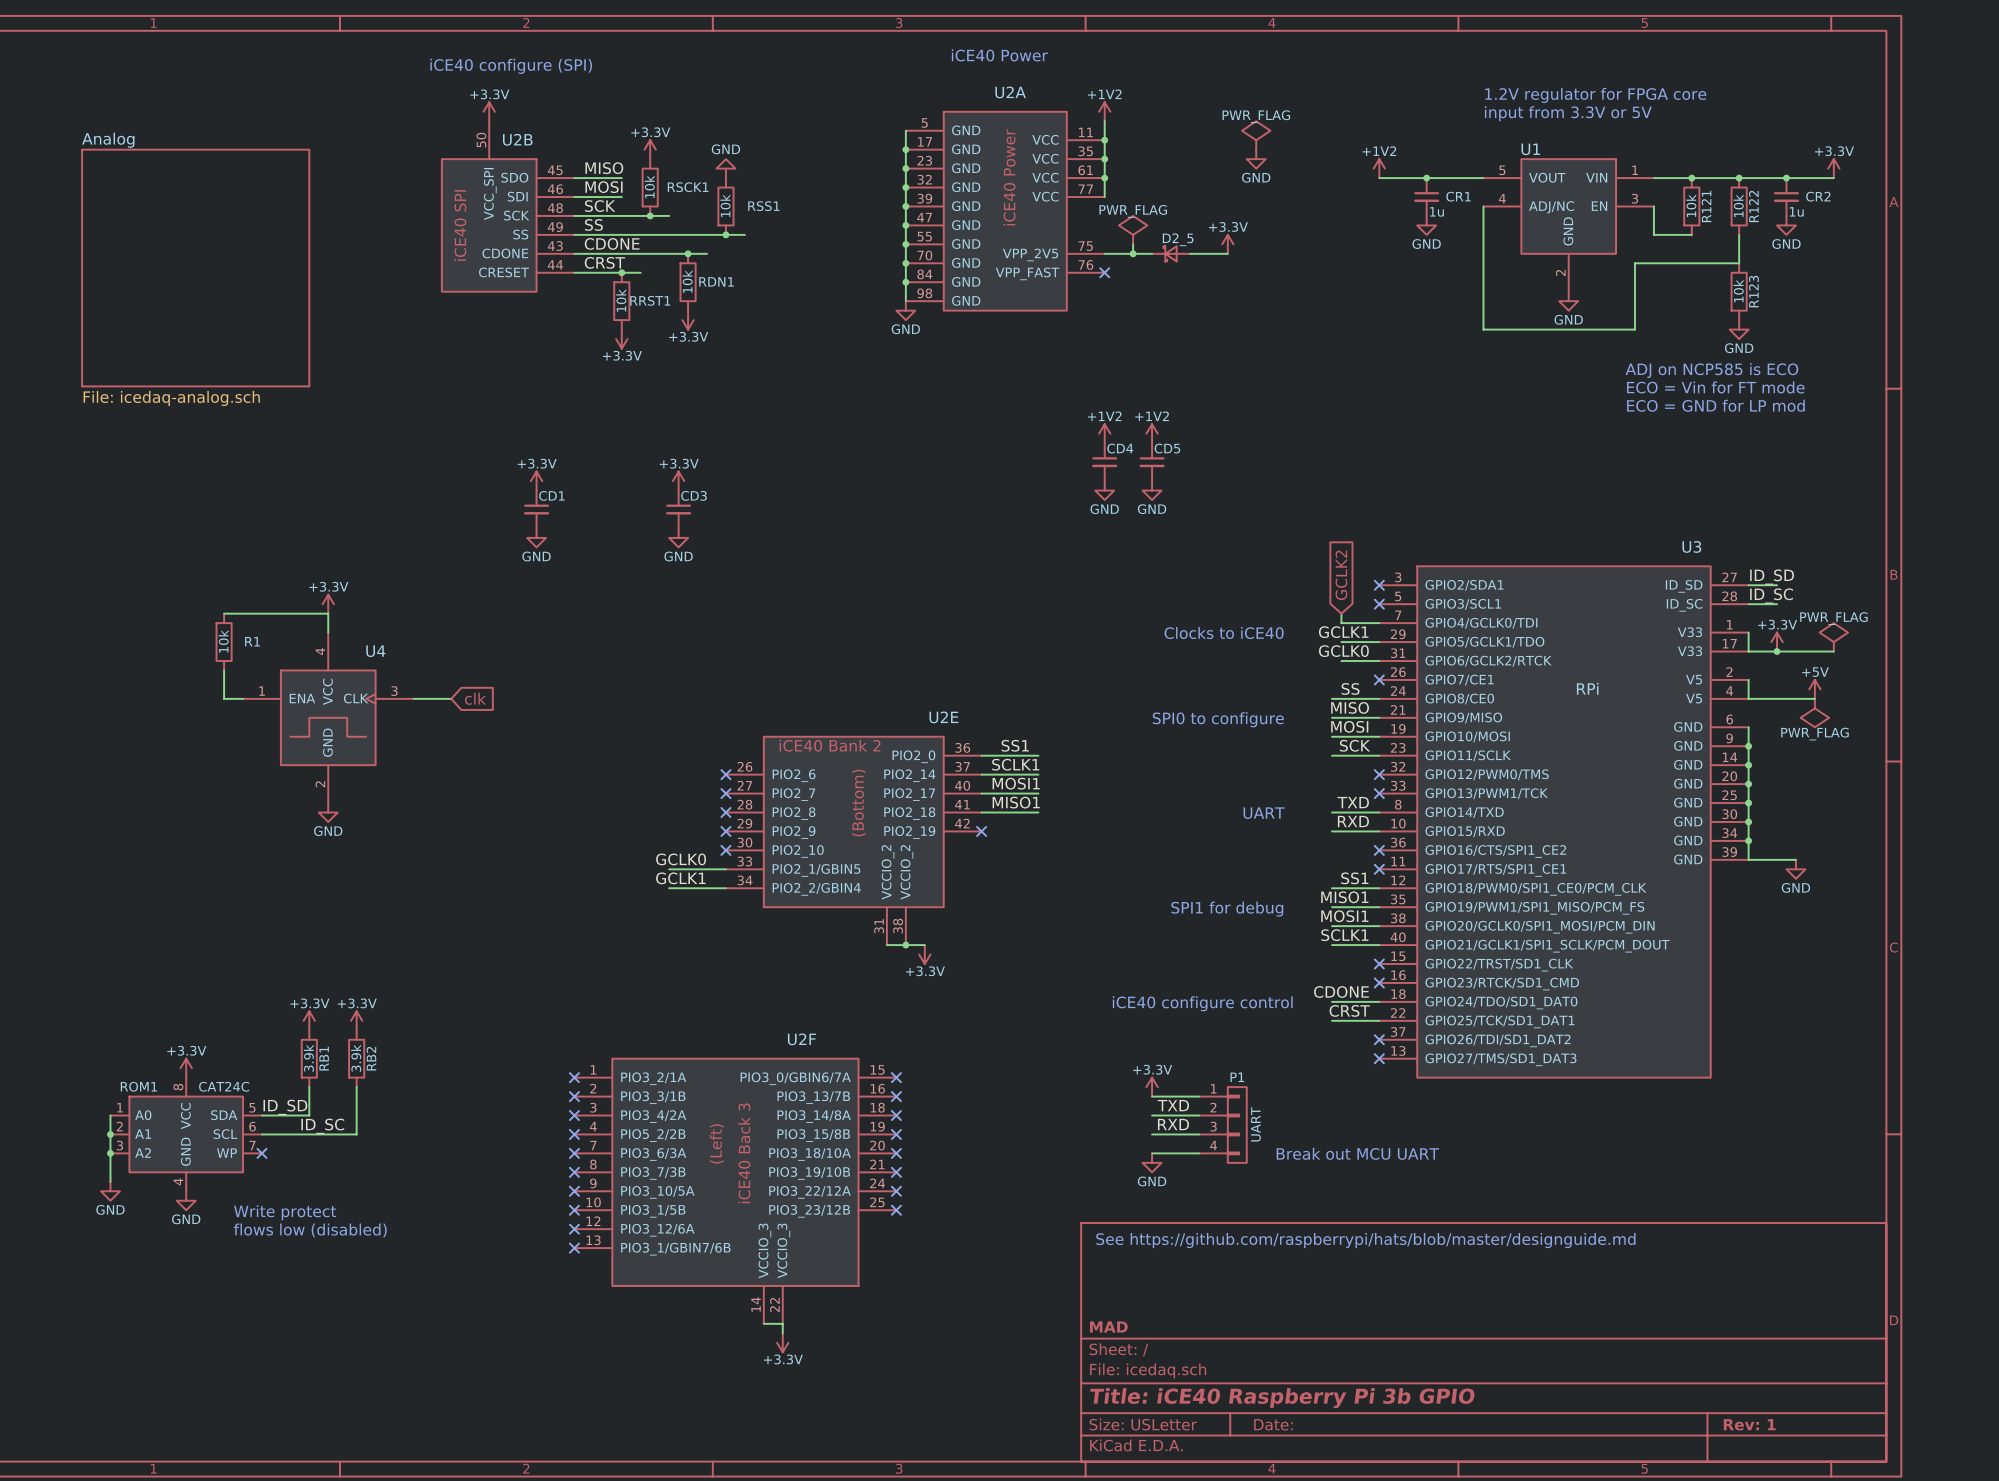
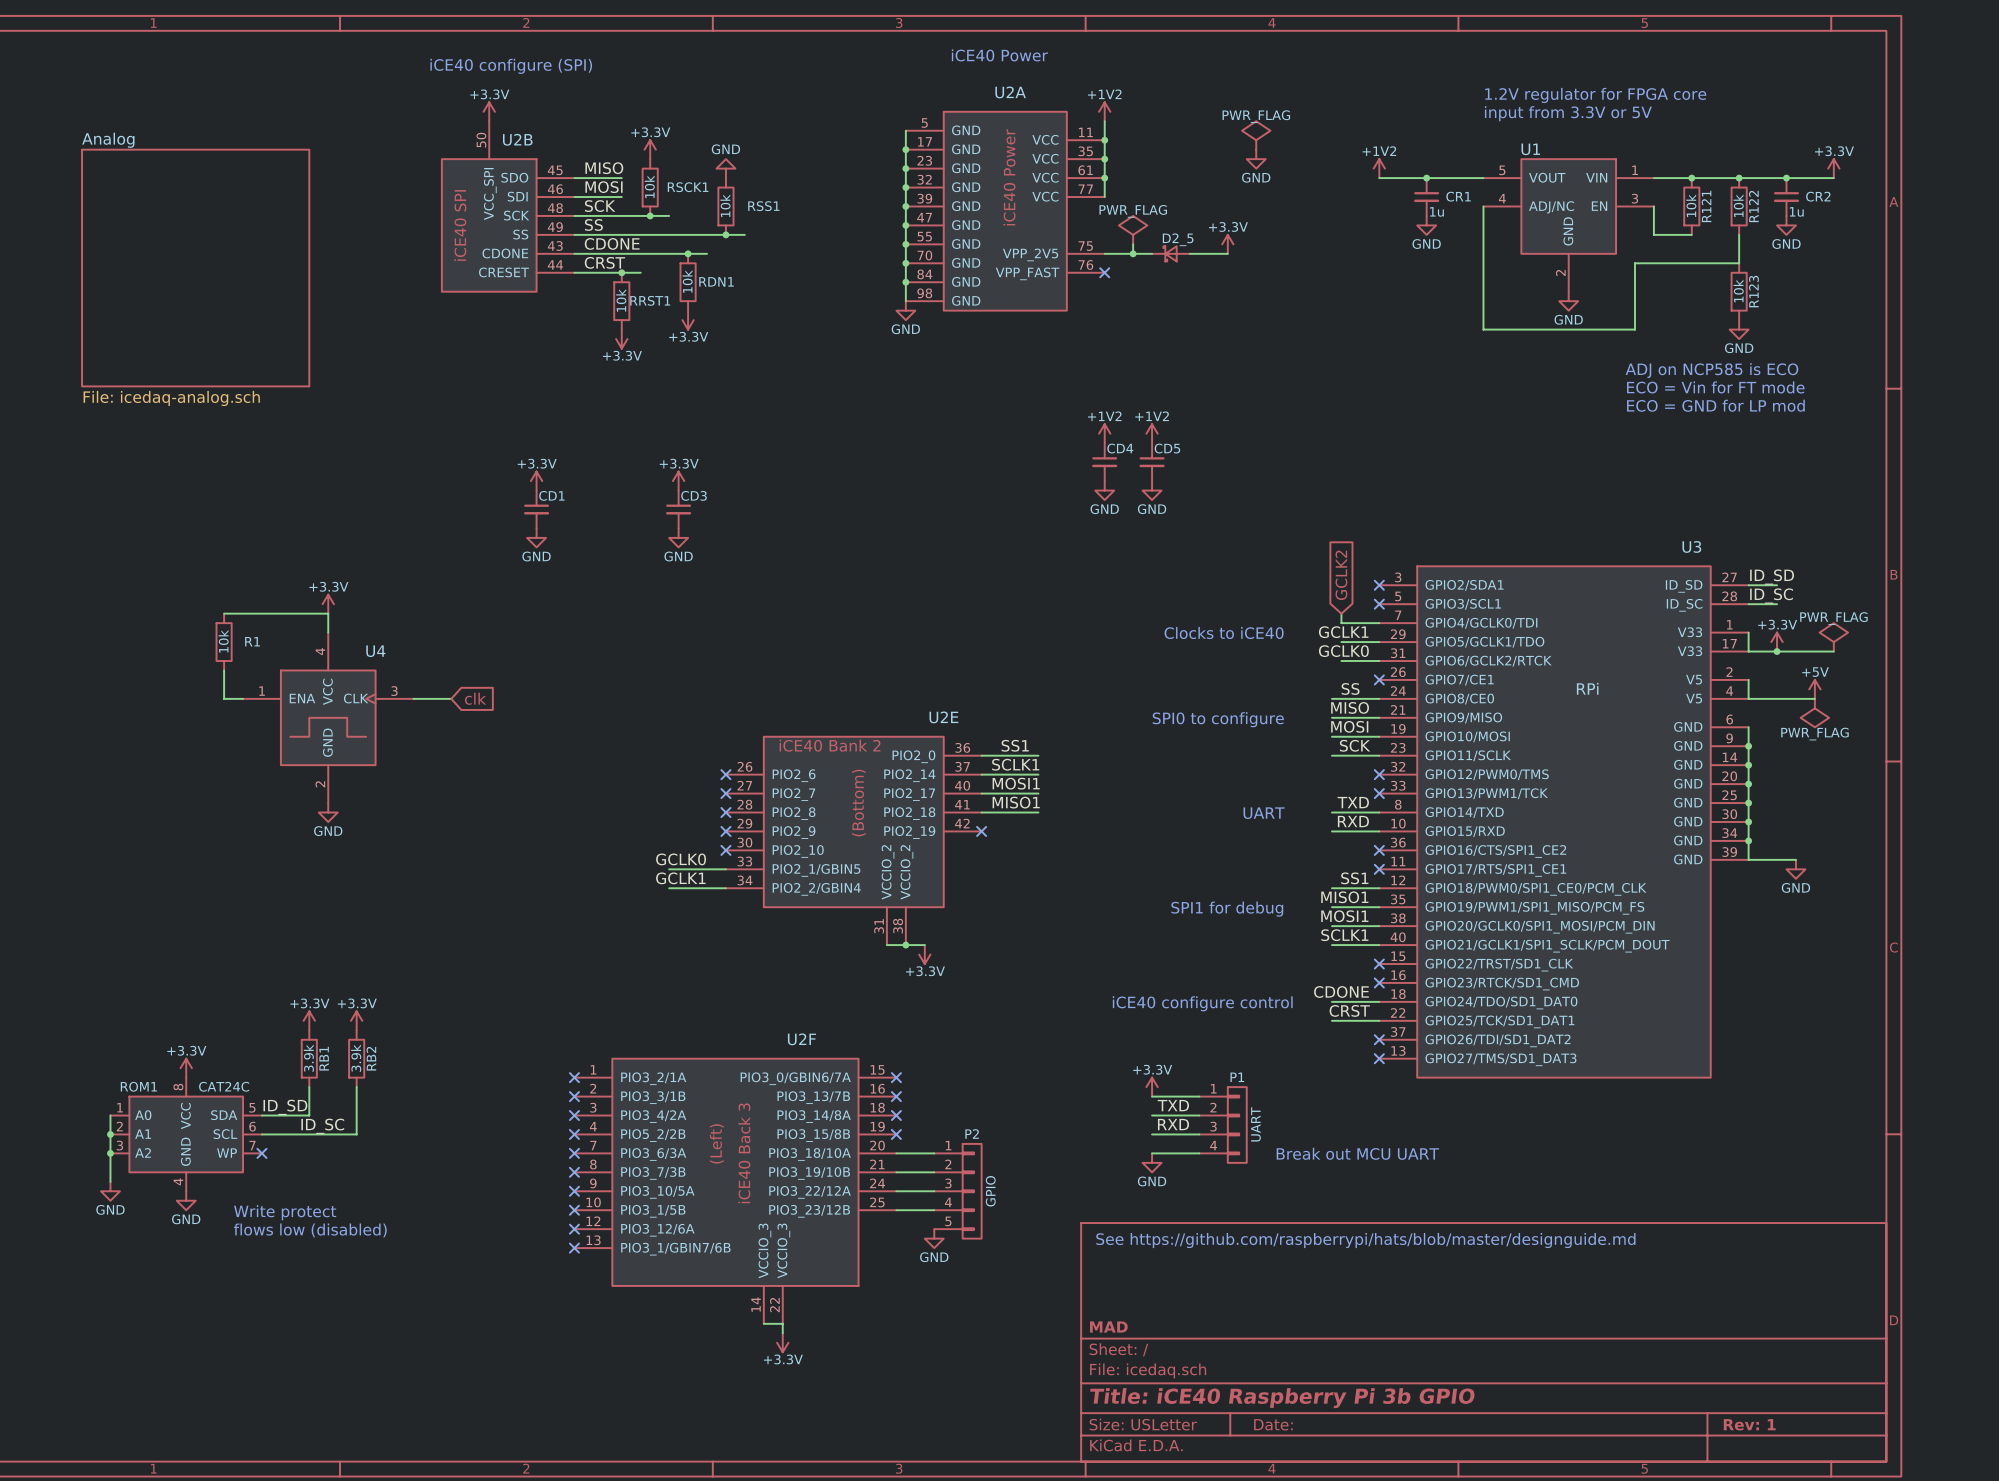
wire: none -> (896, 1153) (934, 1153)
no-connect mark: (896, 1153) -> none
wire: none -> (896, 1172) (934, 1172)
no-connect mark: (896, 1172) -> none
wire: none -> (896, 1191) (934, 1191)
no-connect mark: (896, 1191) -> none
P2: none -> GPIO (957, 1191)
wire: none -> (896, 1210) (934, 1210)
no-connect mark: (896, 1210) -> none
power symbol: none -> GND (934, 1238)

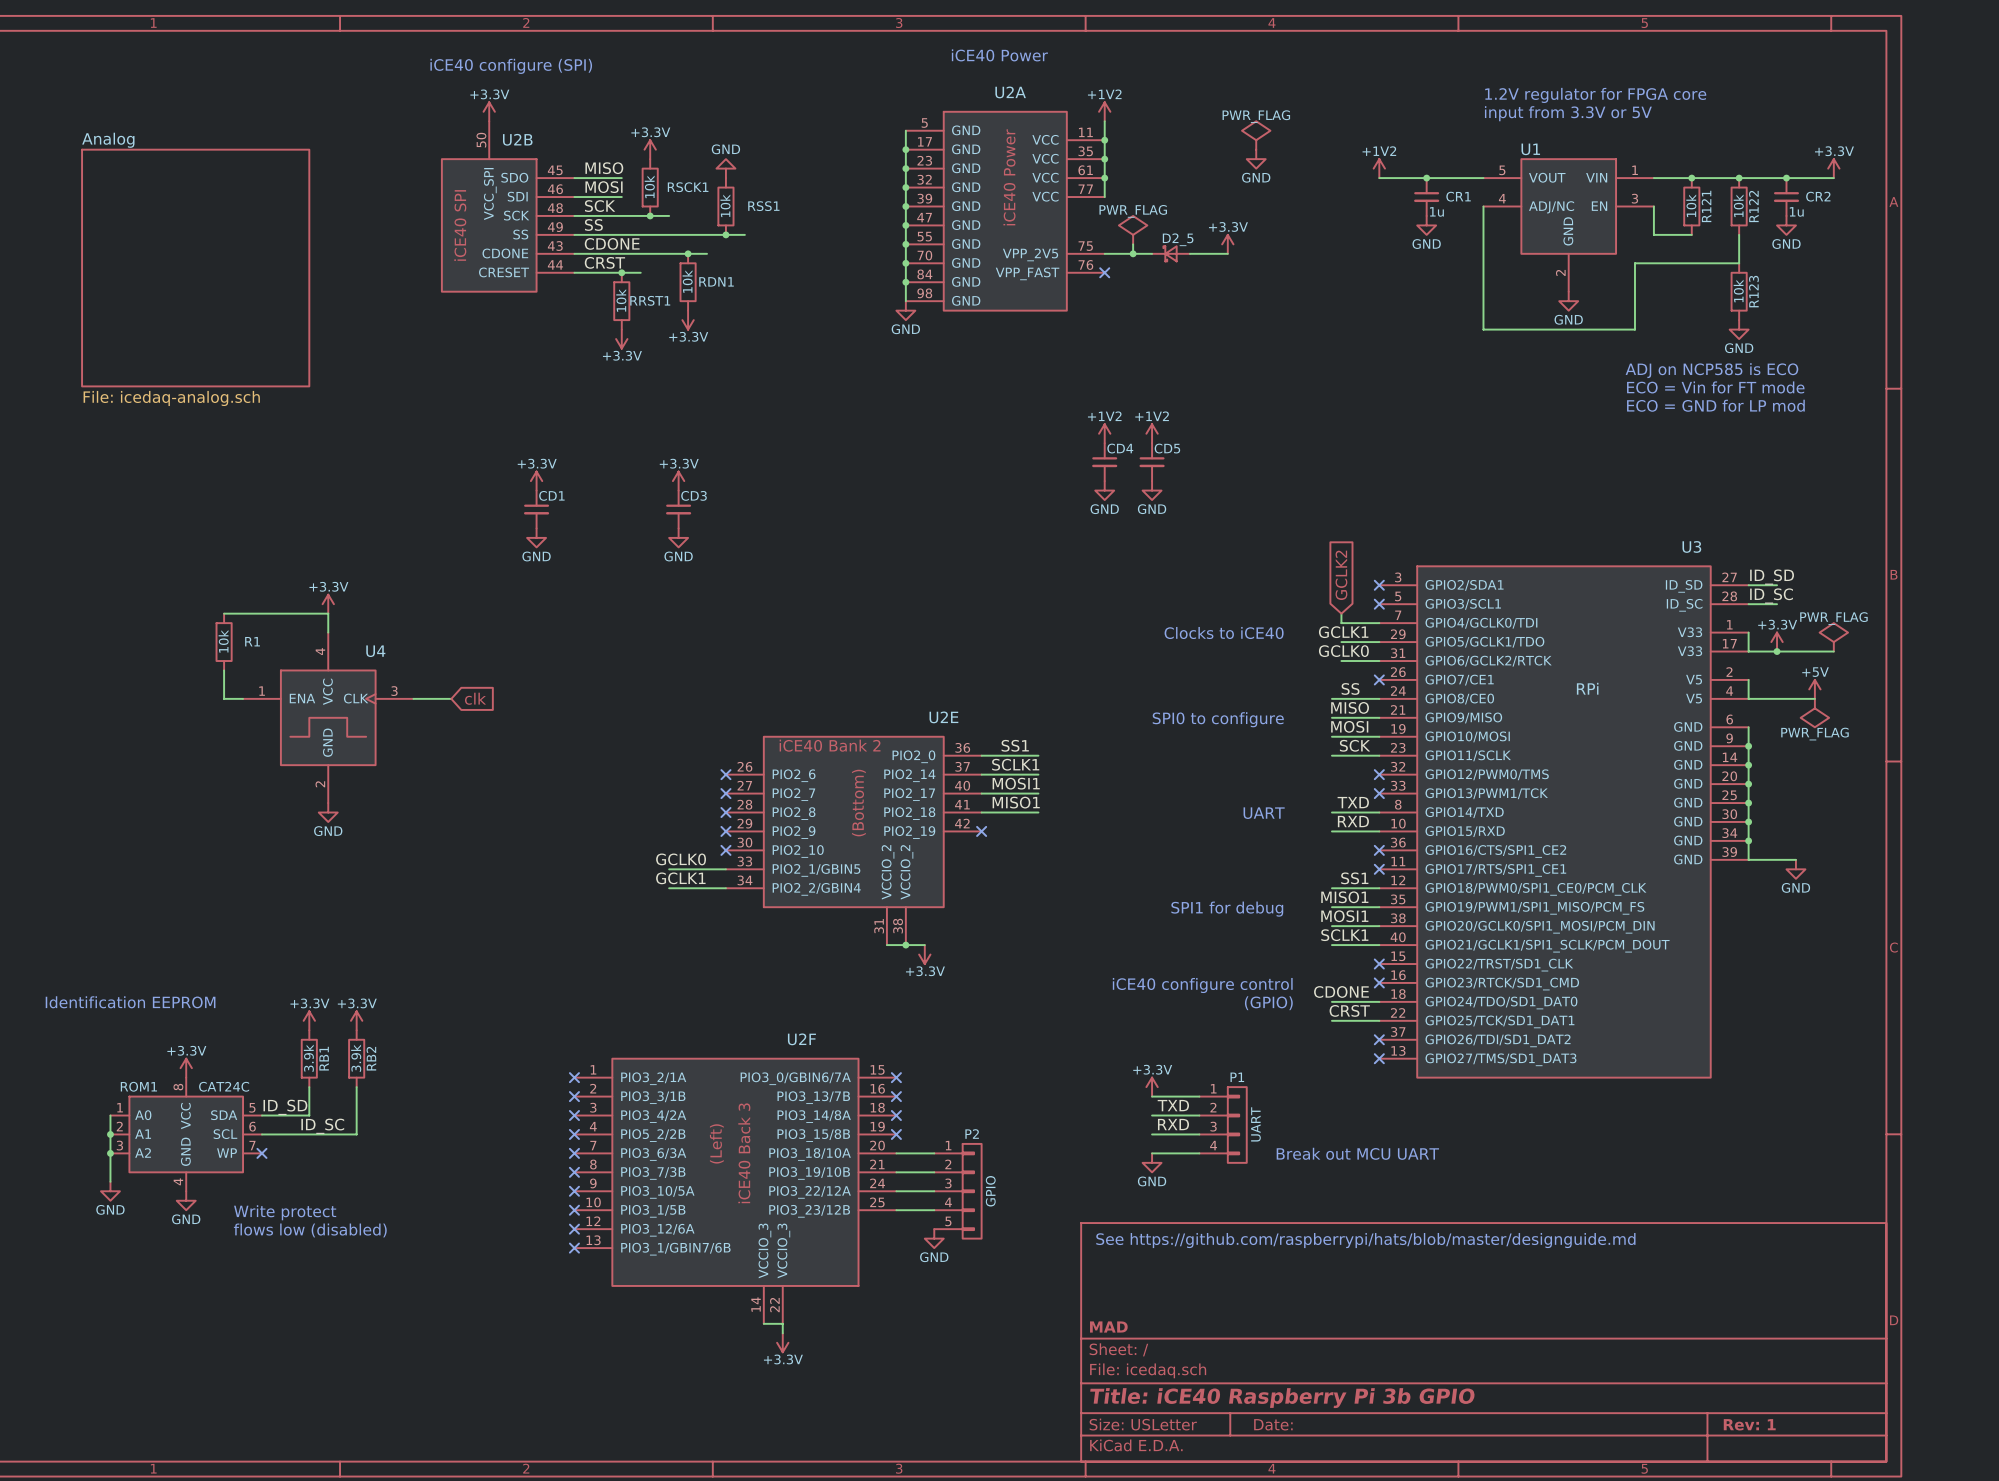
text: none -> iCE40 configure control (1202, 985)
text: none -> Identification EEPROM (130, 1002)
text: iCE40 configure control (1202, 1003) -> (GPIO) (1268, 1003)

